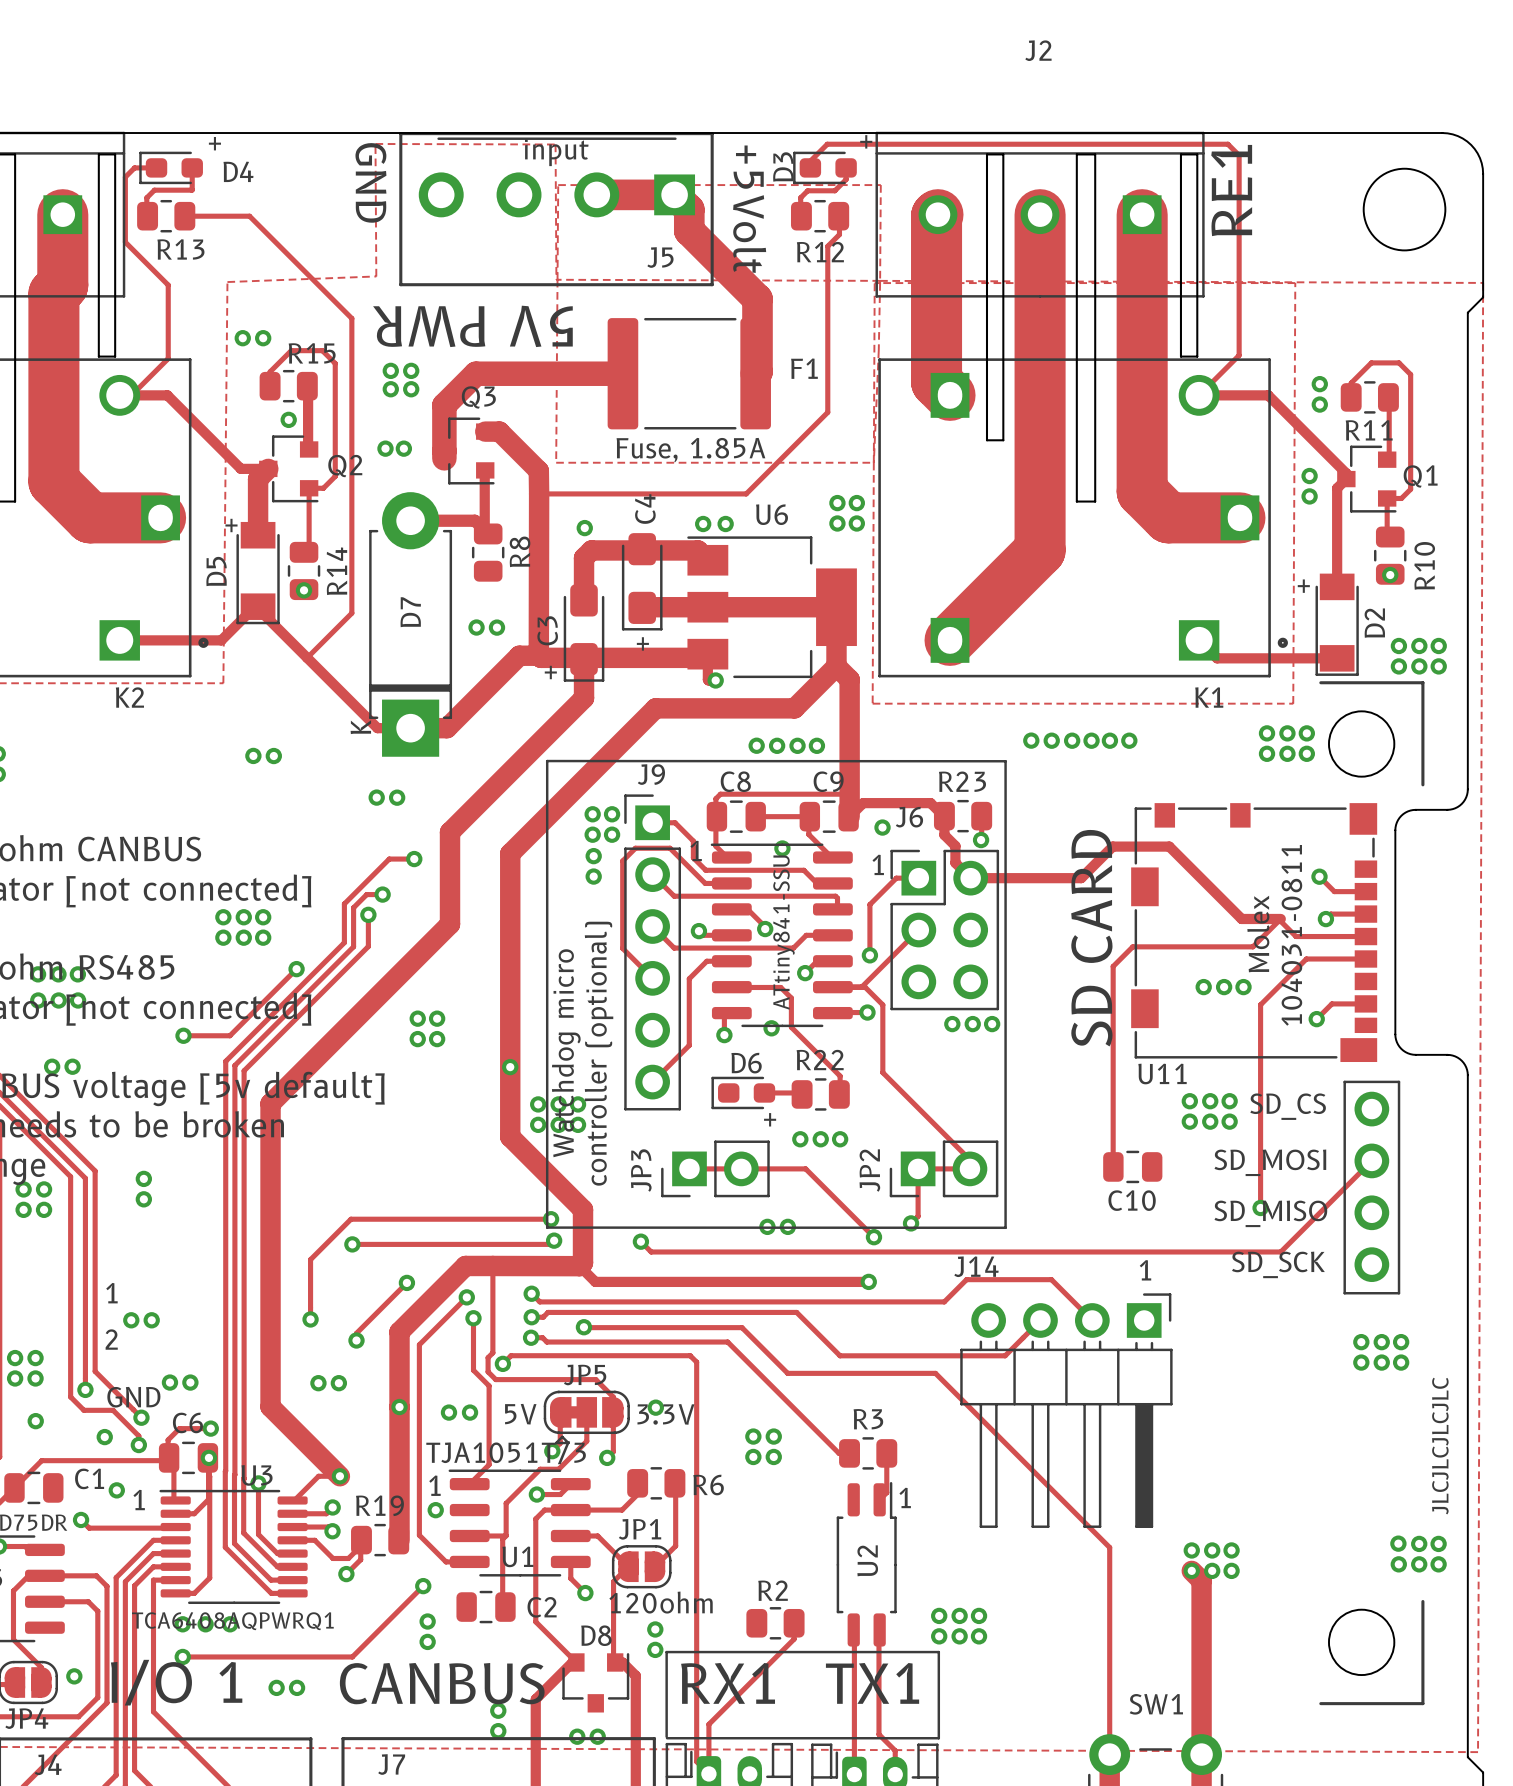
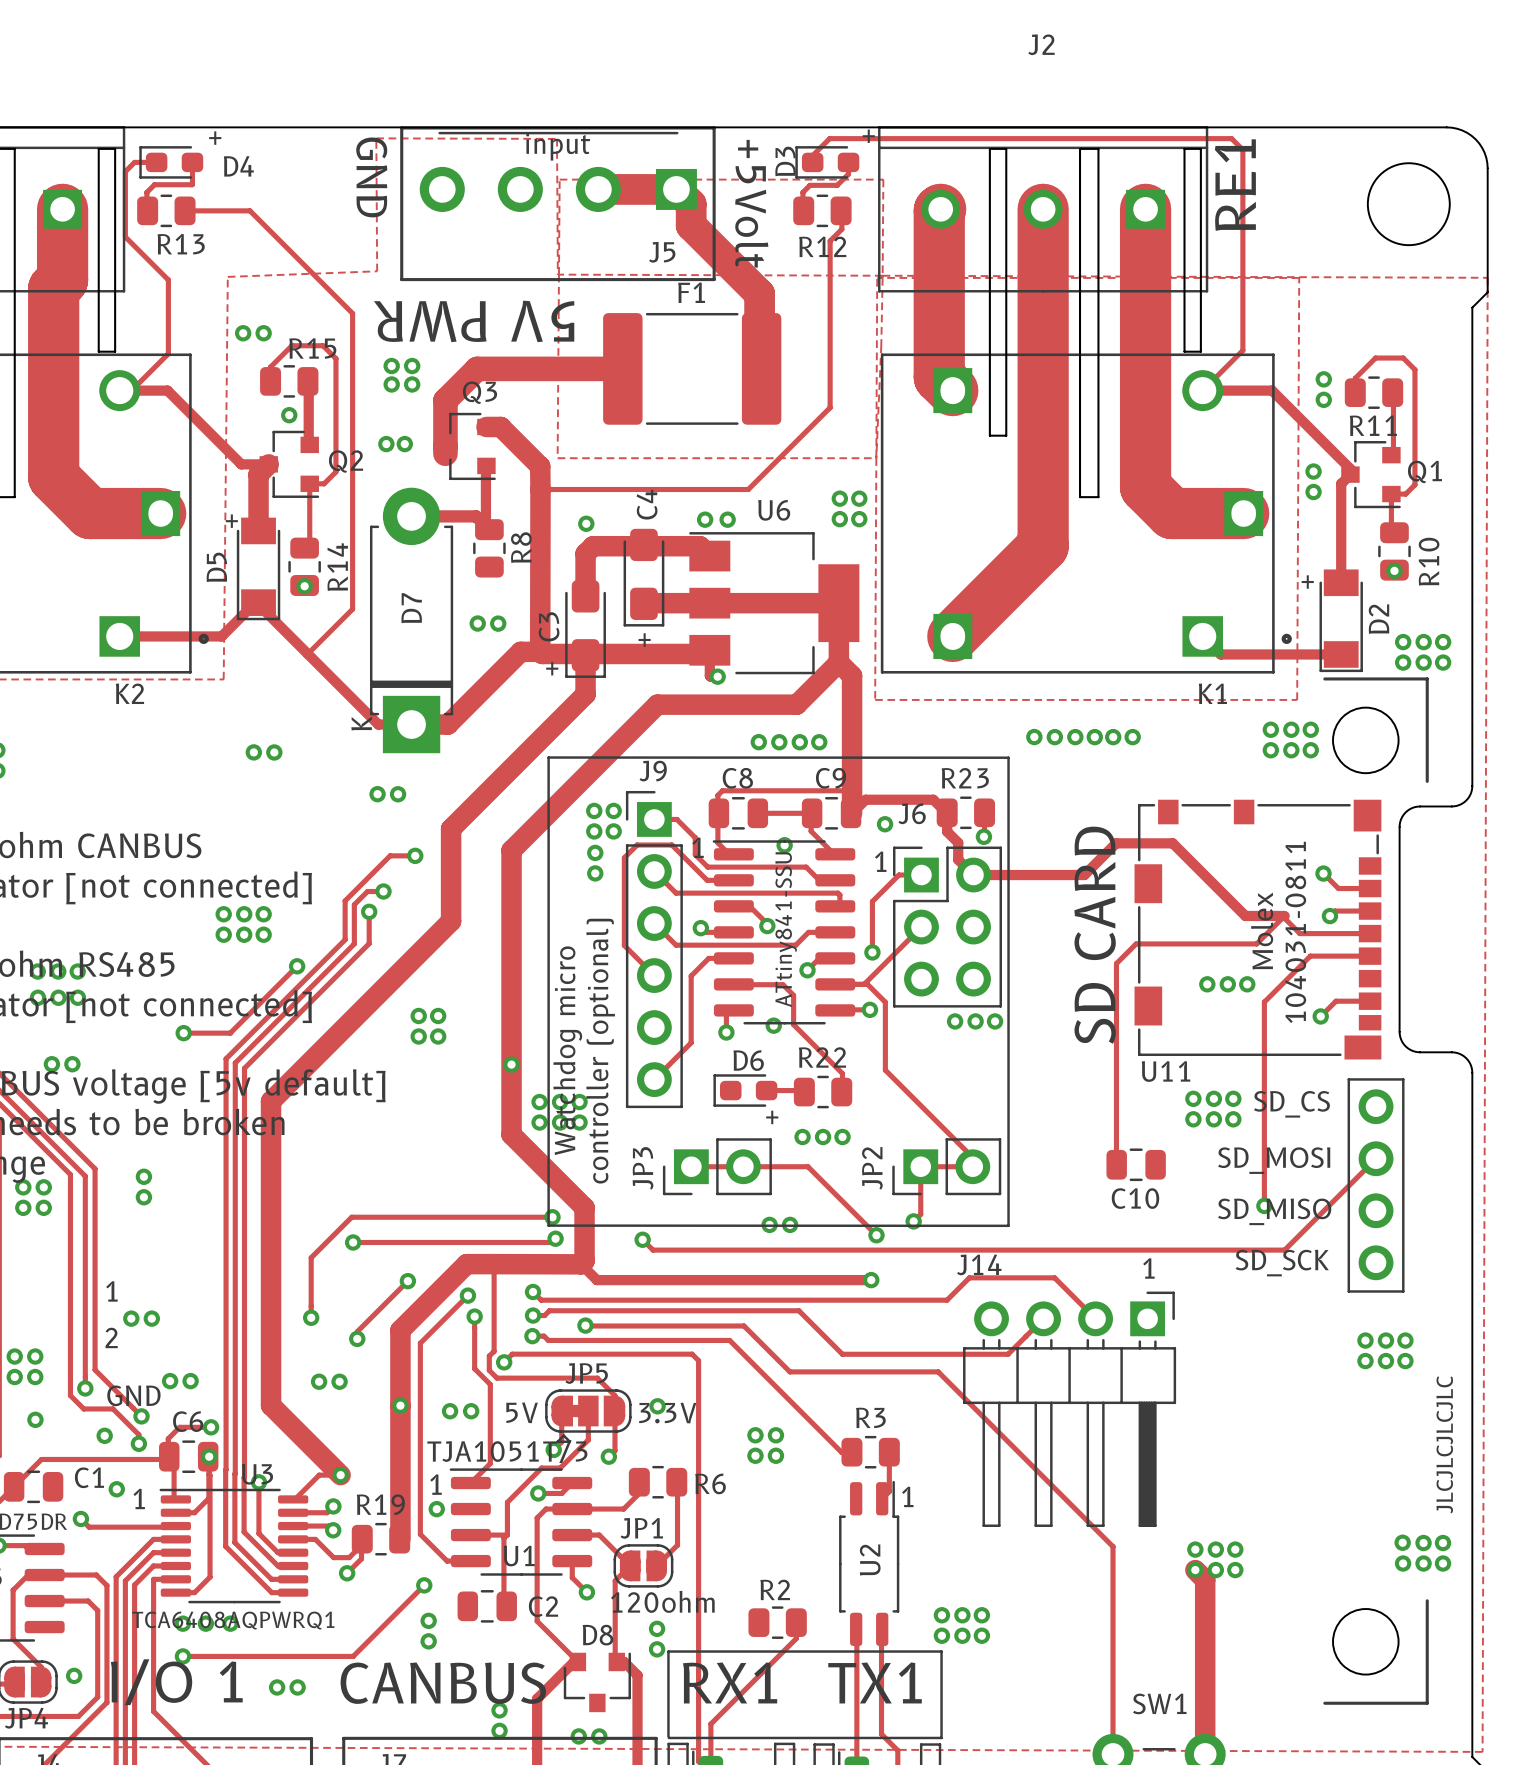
F1 footprint: [607, 317, 771, 430] -> [603, 312, 782, 425]
F1 name position: F1 (804, 368) -> F1 (691, 292)
F1 value: Fuse, 1.85A (690, 450) -> none

